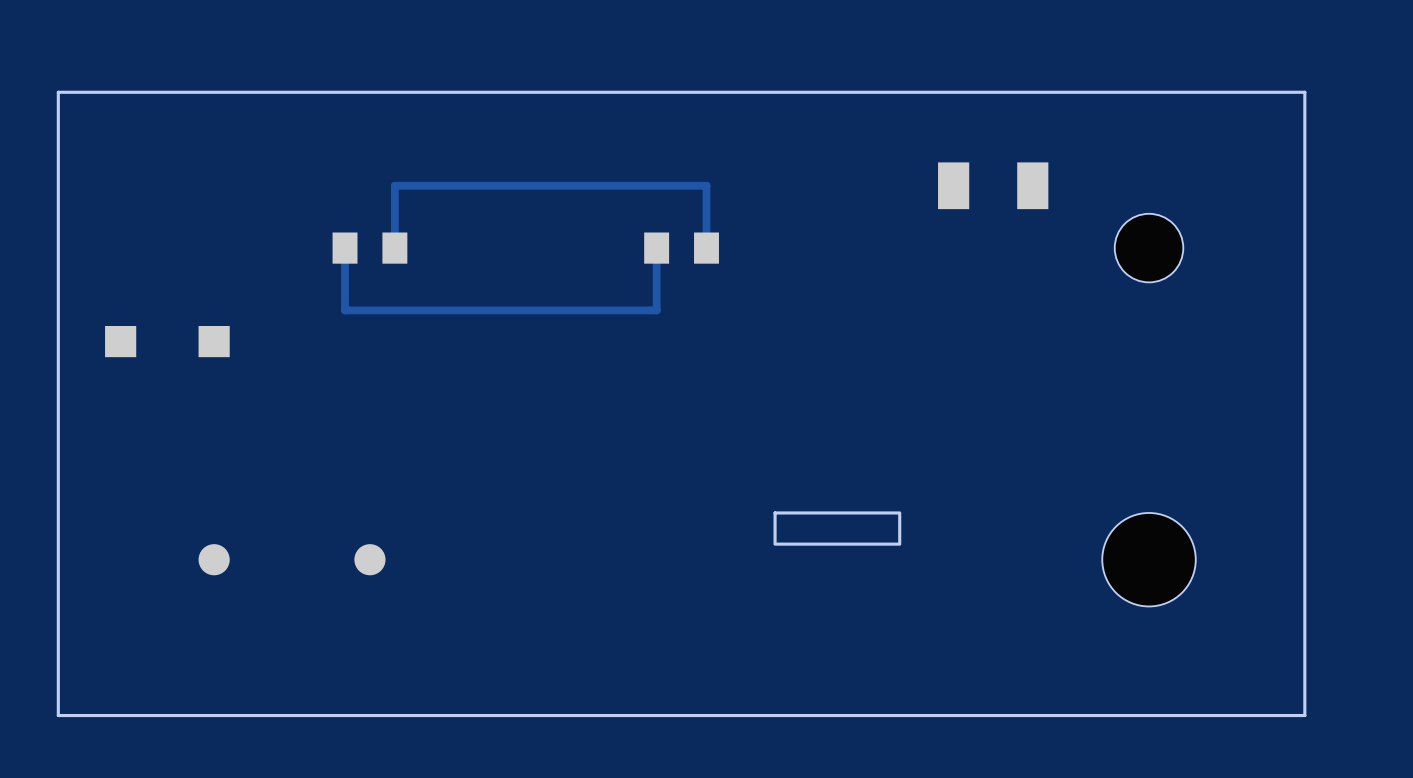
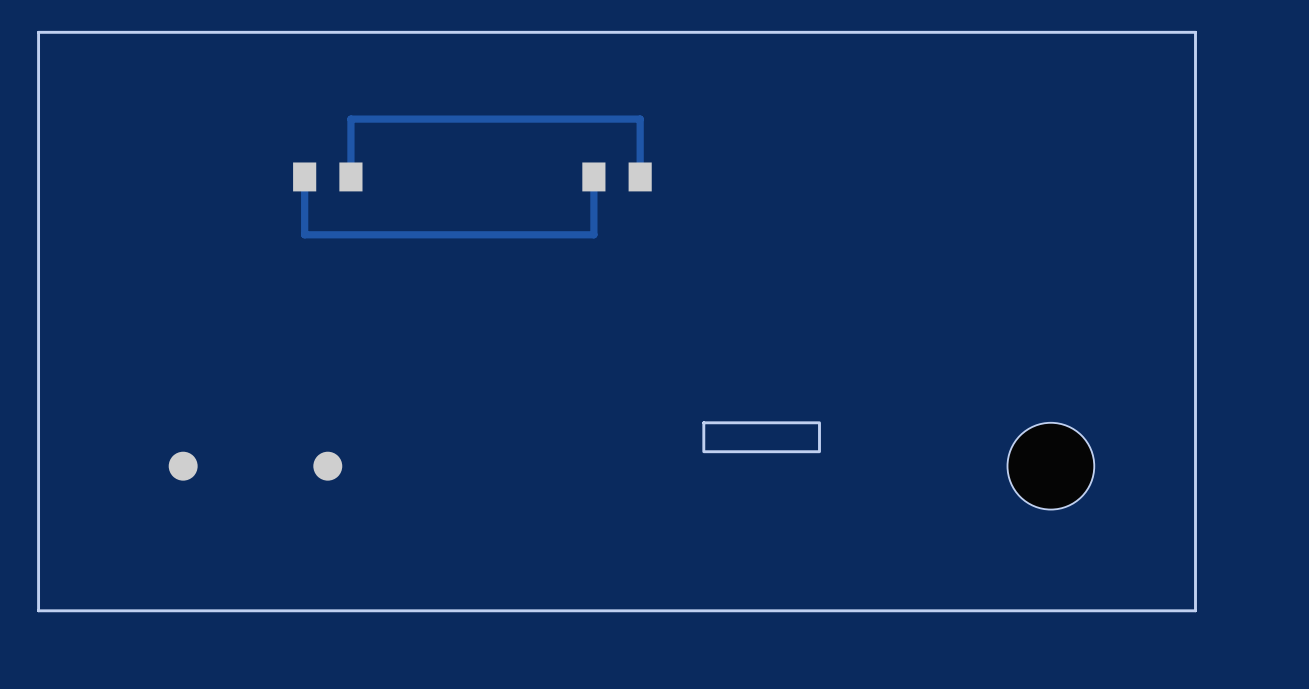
part: (993, 185) -> none
part: (1149, 248) -> none
part: (167, 341) -> none

